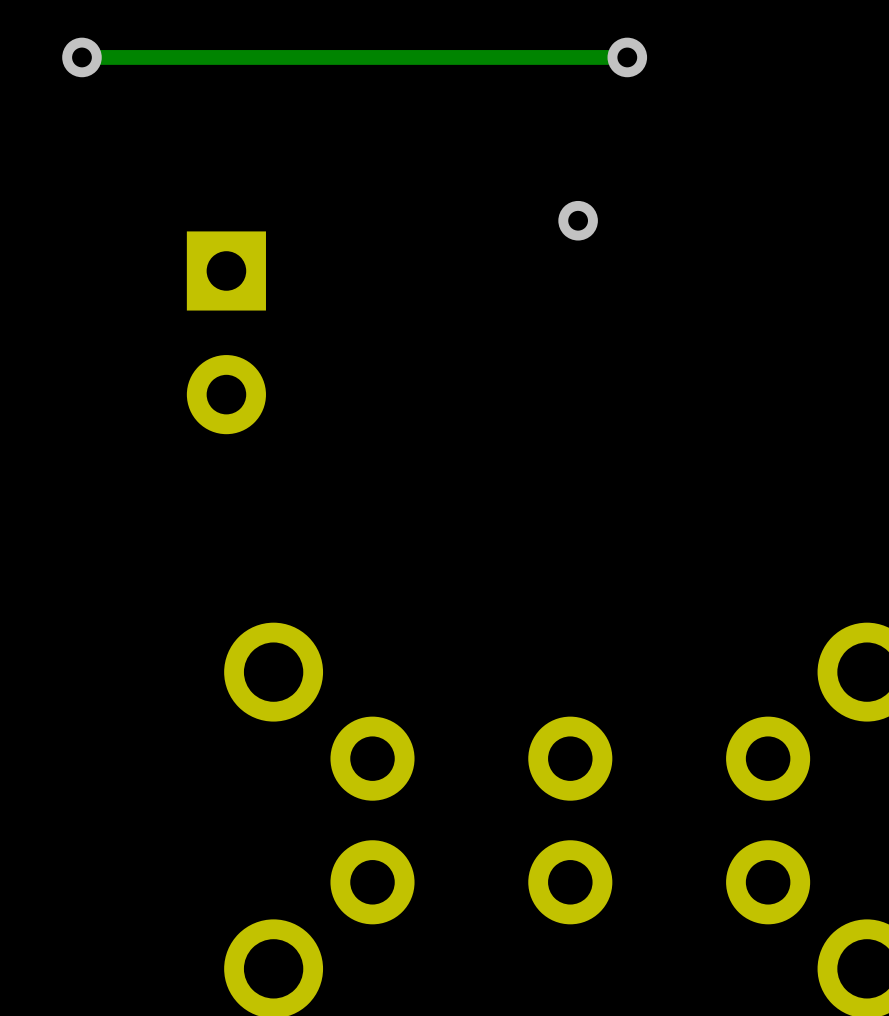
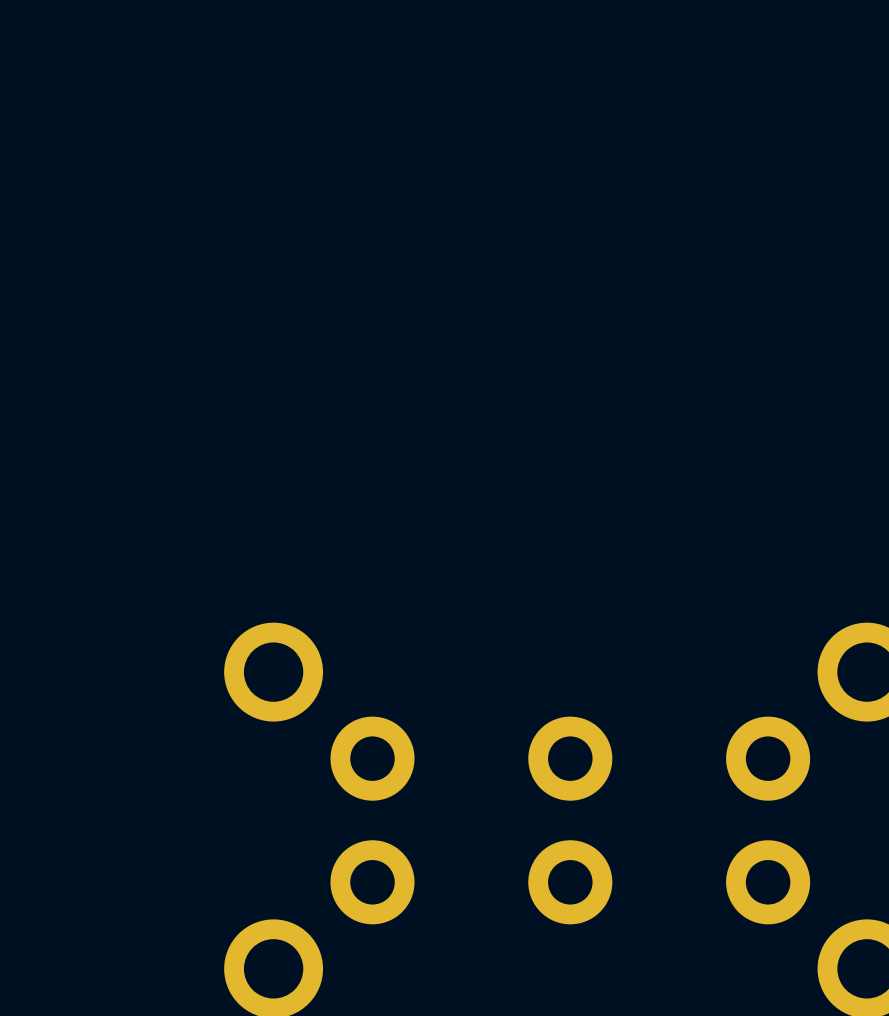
via: (81, 57) -> none
track: (627, 57) (81, 57) -> none
via: (627, 57) -> none
via: (578, 220) -> none
part: (226, 332) -> none

